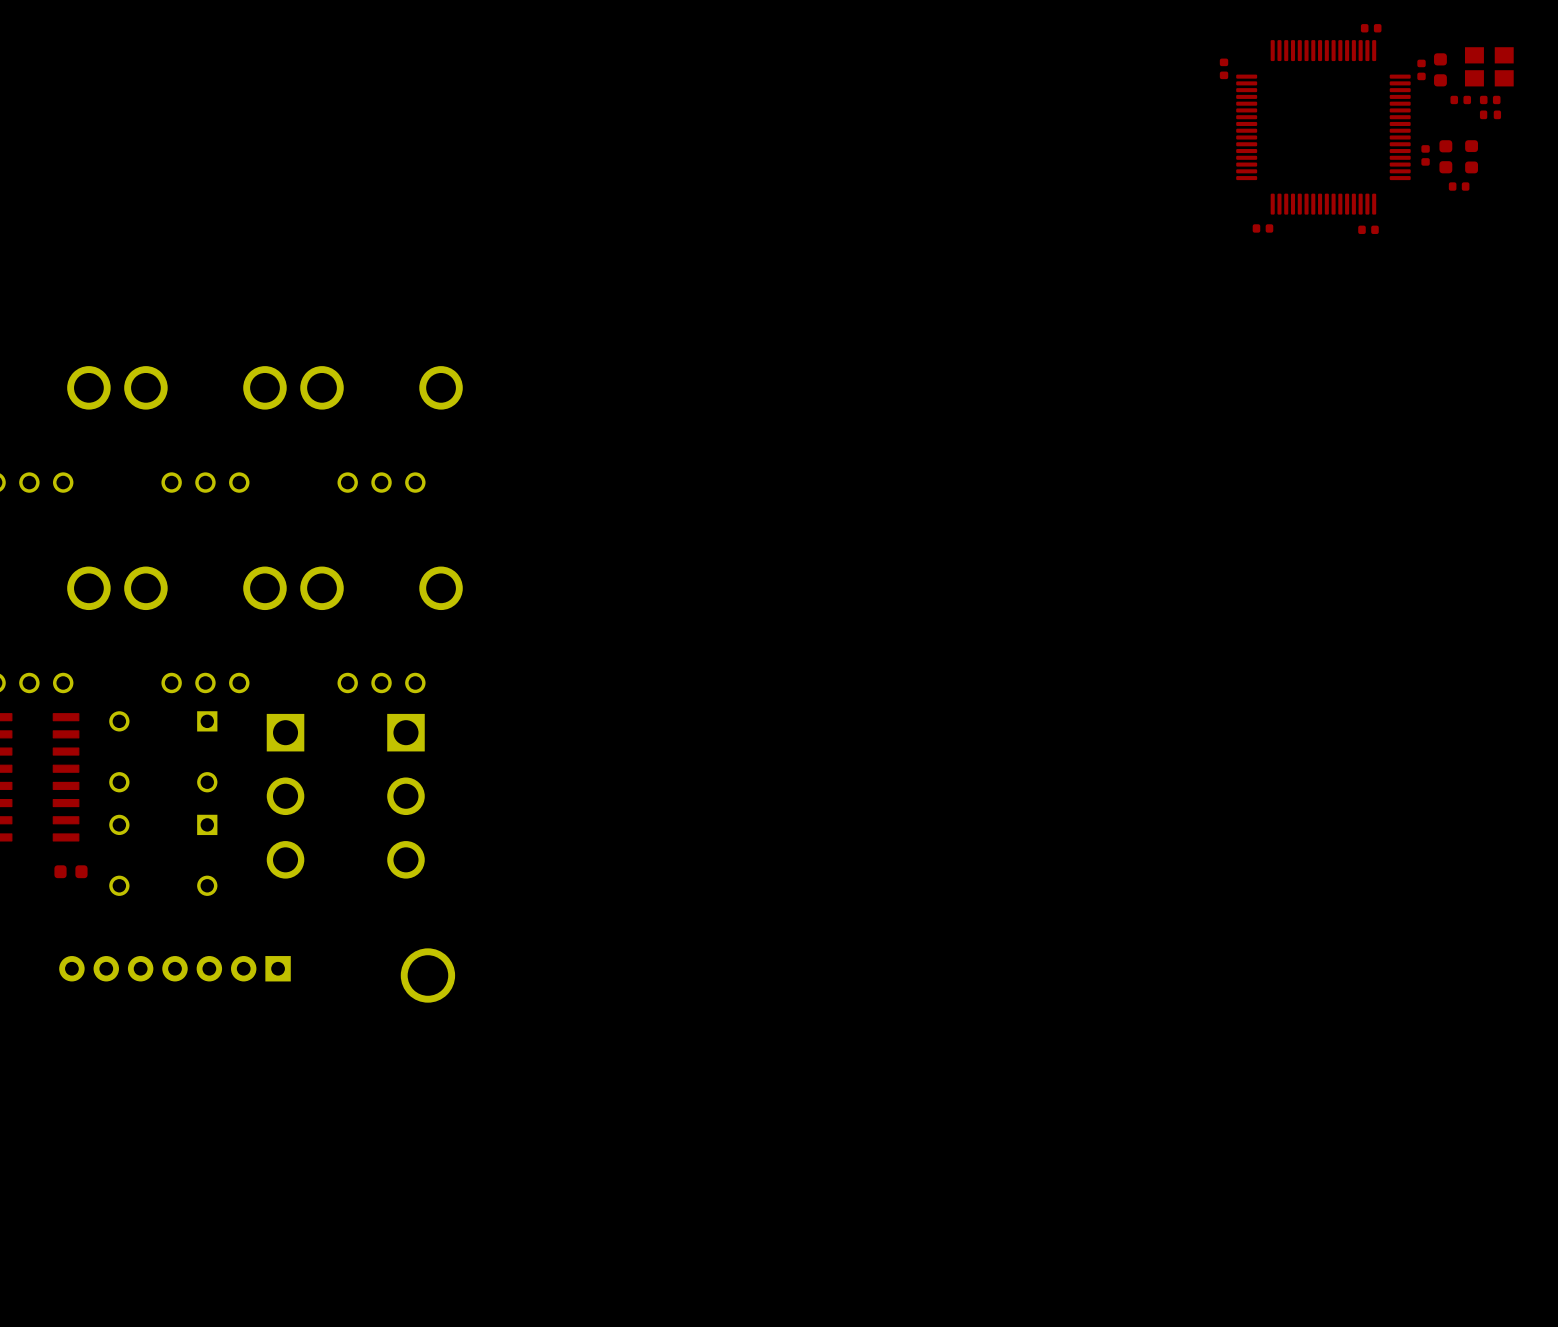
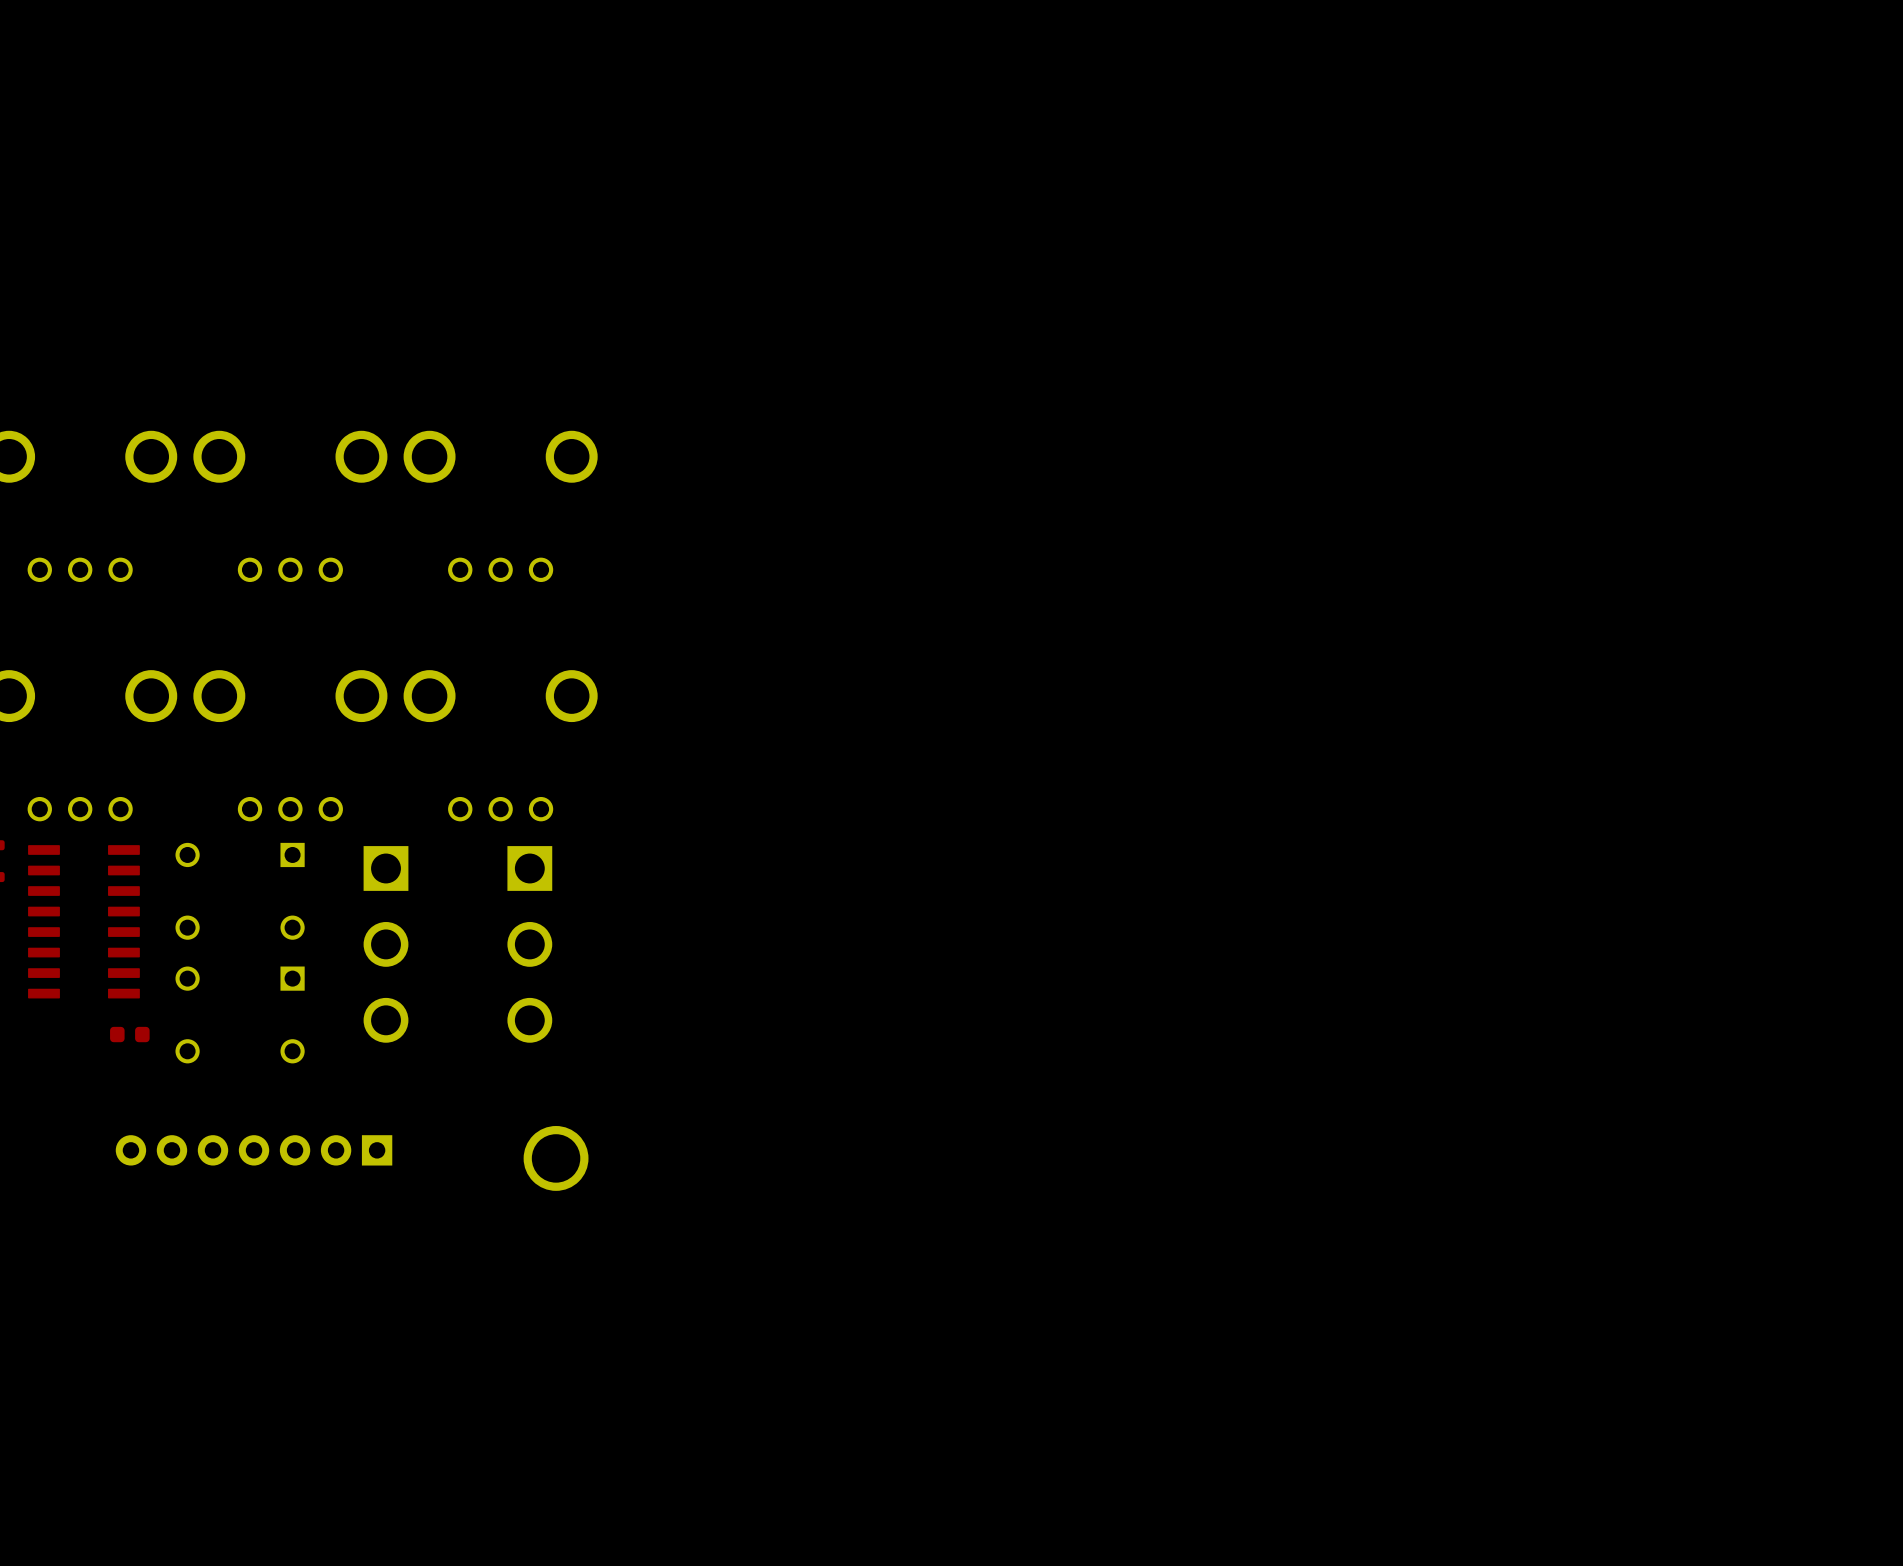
part: (1371, 28) -> none
part: (1489, 66) -> none
part: (1224, 68) -> none
part: (1421, 69) -> none
part: (1440, 69) -> none
part: (1460, 99) -> none
part: (1490, 99) -> none
part: (1490, 114) -> none
part: (1323, 127) -> none
part: (1425, 155) -> none
part: (1445, 156) -> none
part: (1471, 156) -> none
part: (1459, 186) -> none
part: (1262, 228) -> none
part: (1368, 229) -> none

